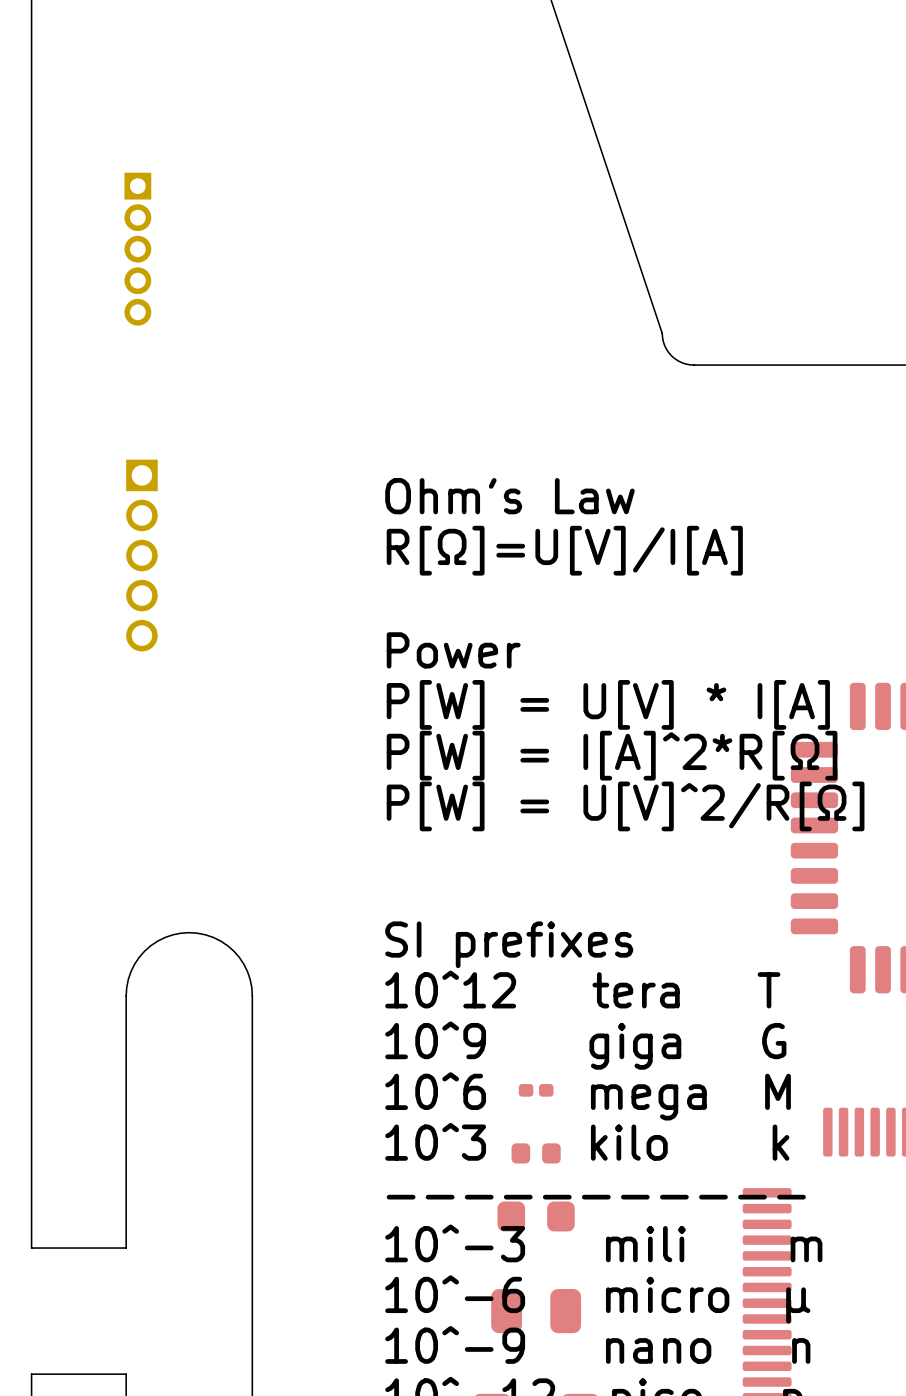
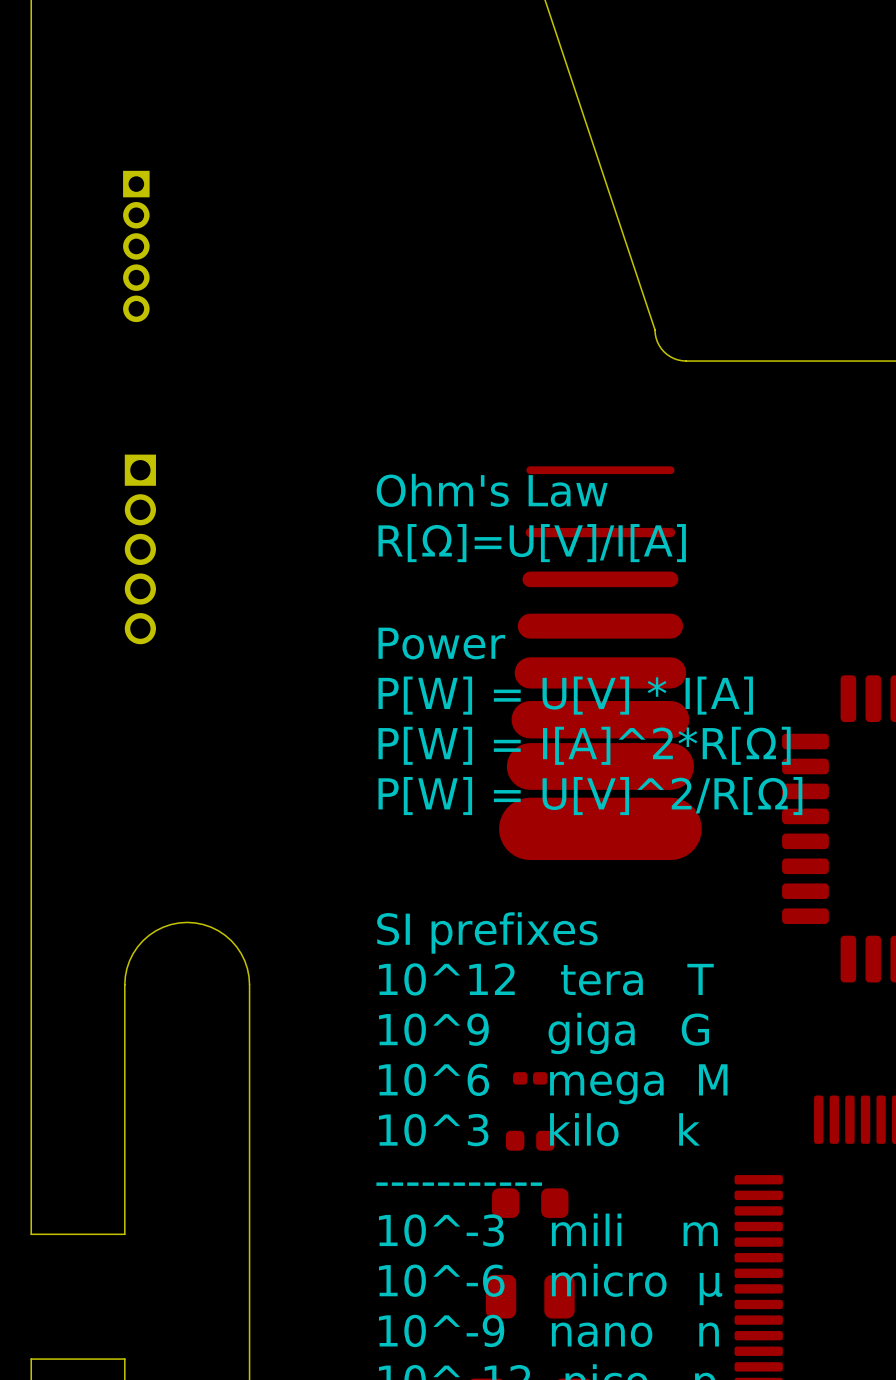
top track: none -> (670, 470) (530, 470)
top track: none -> (670, 532) (530, 532)
top track: none -> (670, 579) (530, 579)
top track: none -> (670, 626) (530, 626)
top track: none -> (670, 672) (530, 672)
top track: none -> (670, 719) (530, 719)
top track: none -> (670, 766) (530, 766)
top track: none -> (670, 828) (530, 828)

